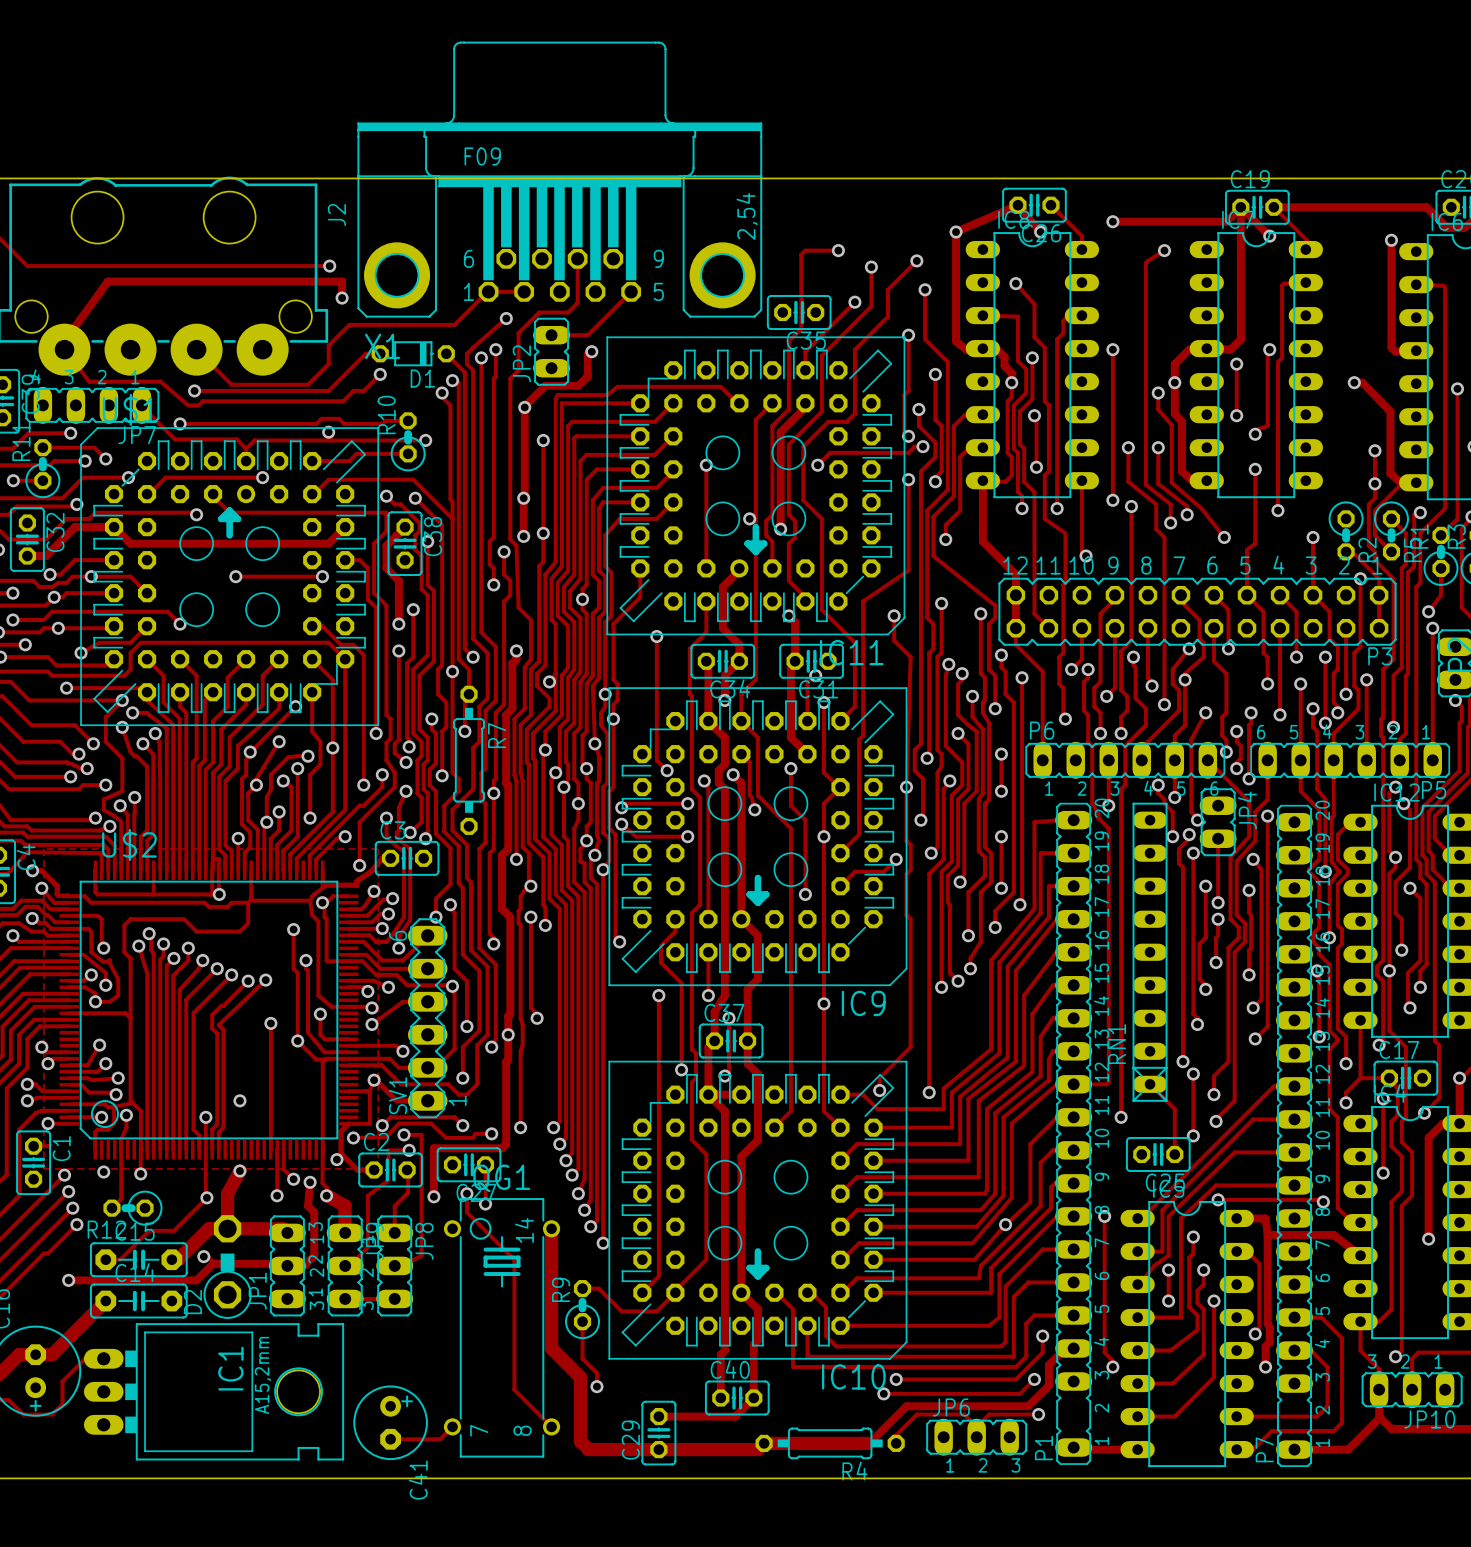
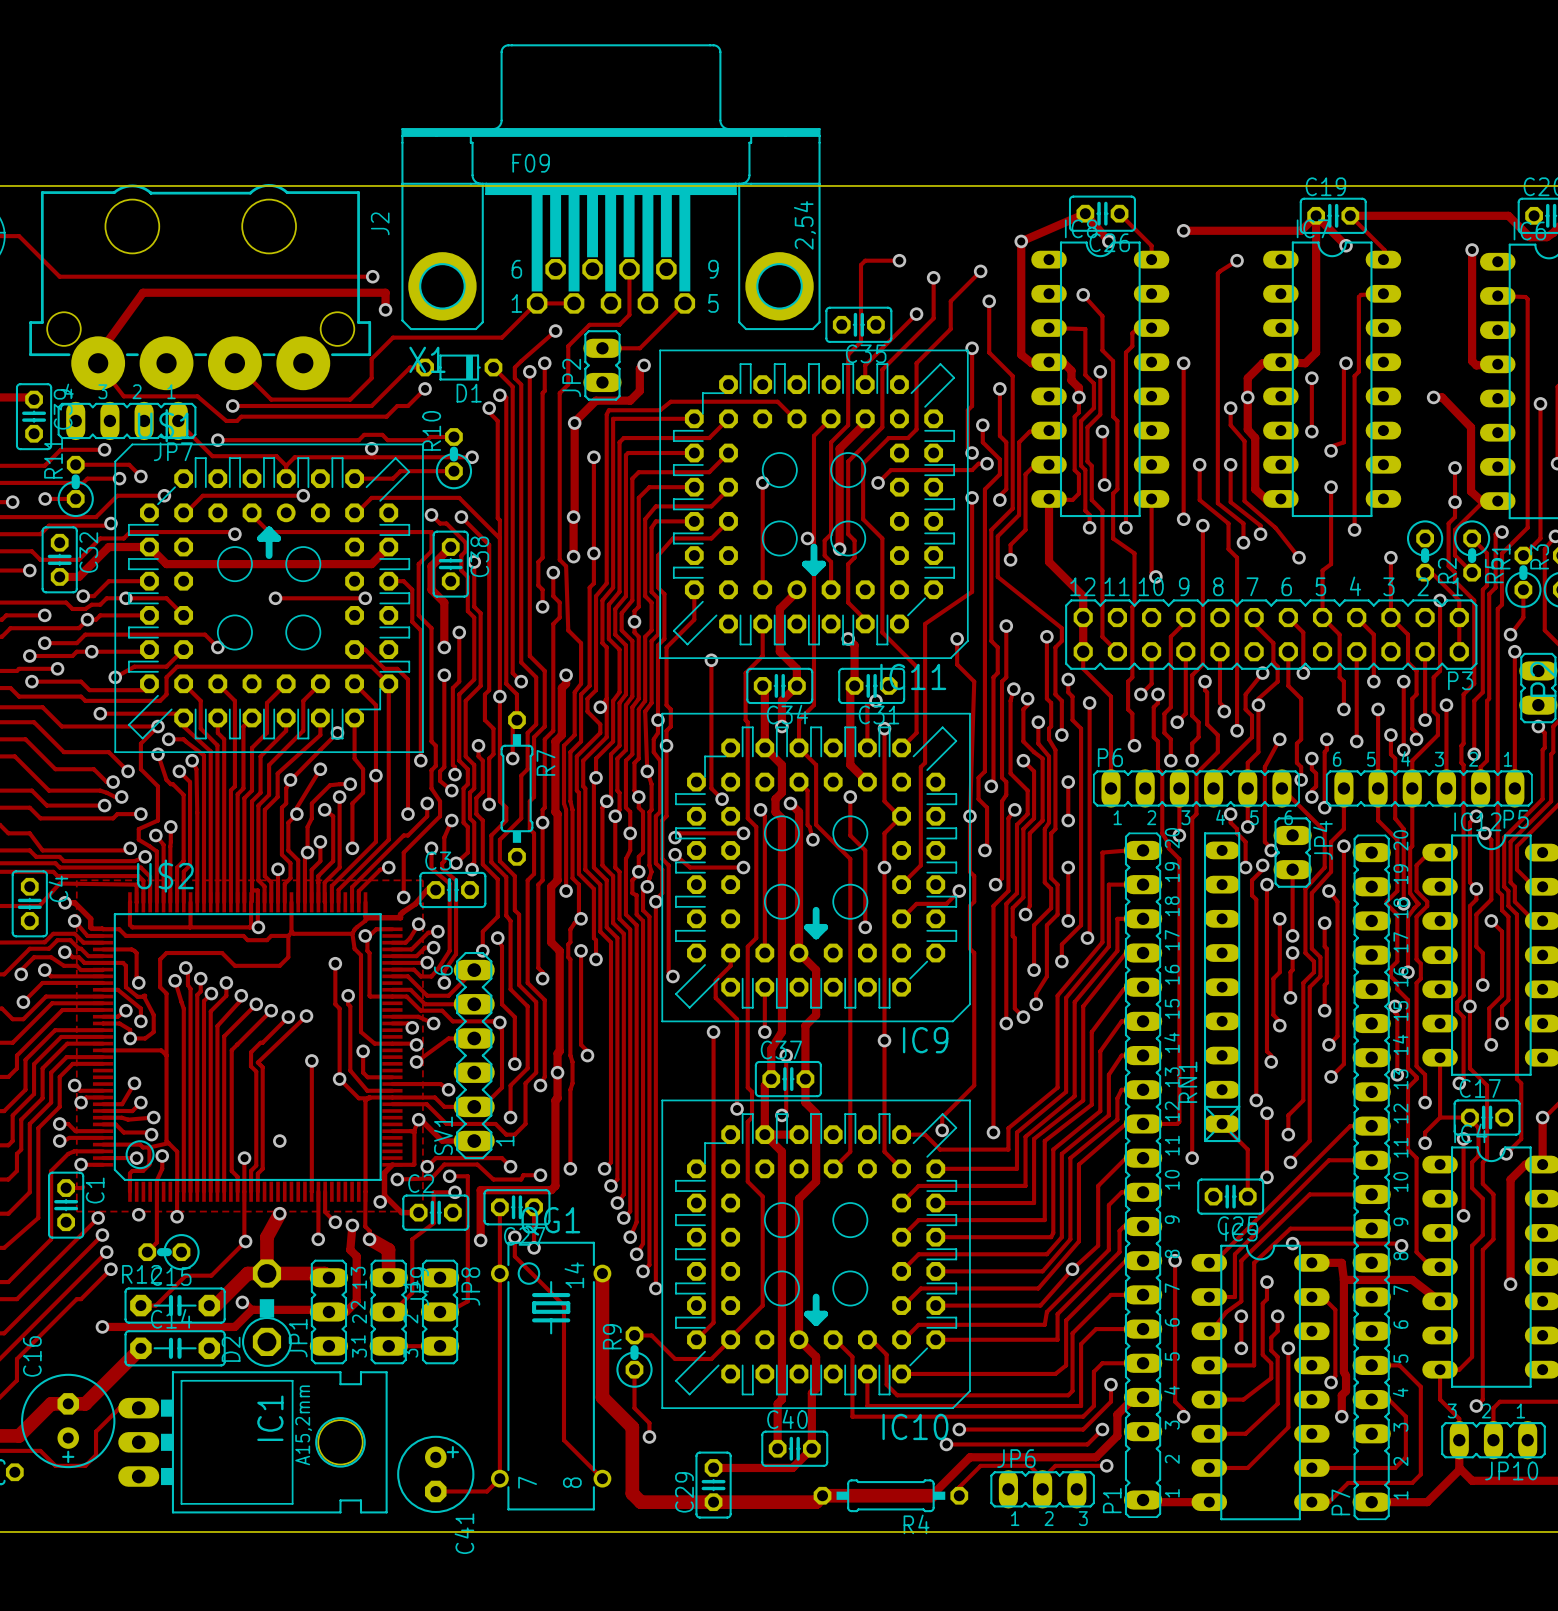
track: none -> (499, 1207) (499, 1478)
track: (407, 1169) (408, 1192) (394, 1206) (394, 1232) -> none

